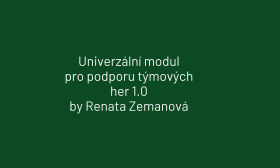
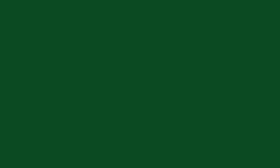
text: Univerzální modul (128, 61) -> none
text: pro podporu týmových (128, 77) -> none
text: her 1.0 (128, 91) -> none
text: by Renata Zemanová (128, 107) -> none

